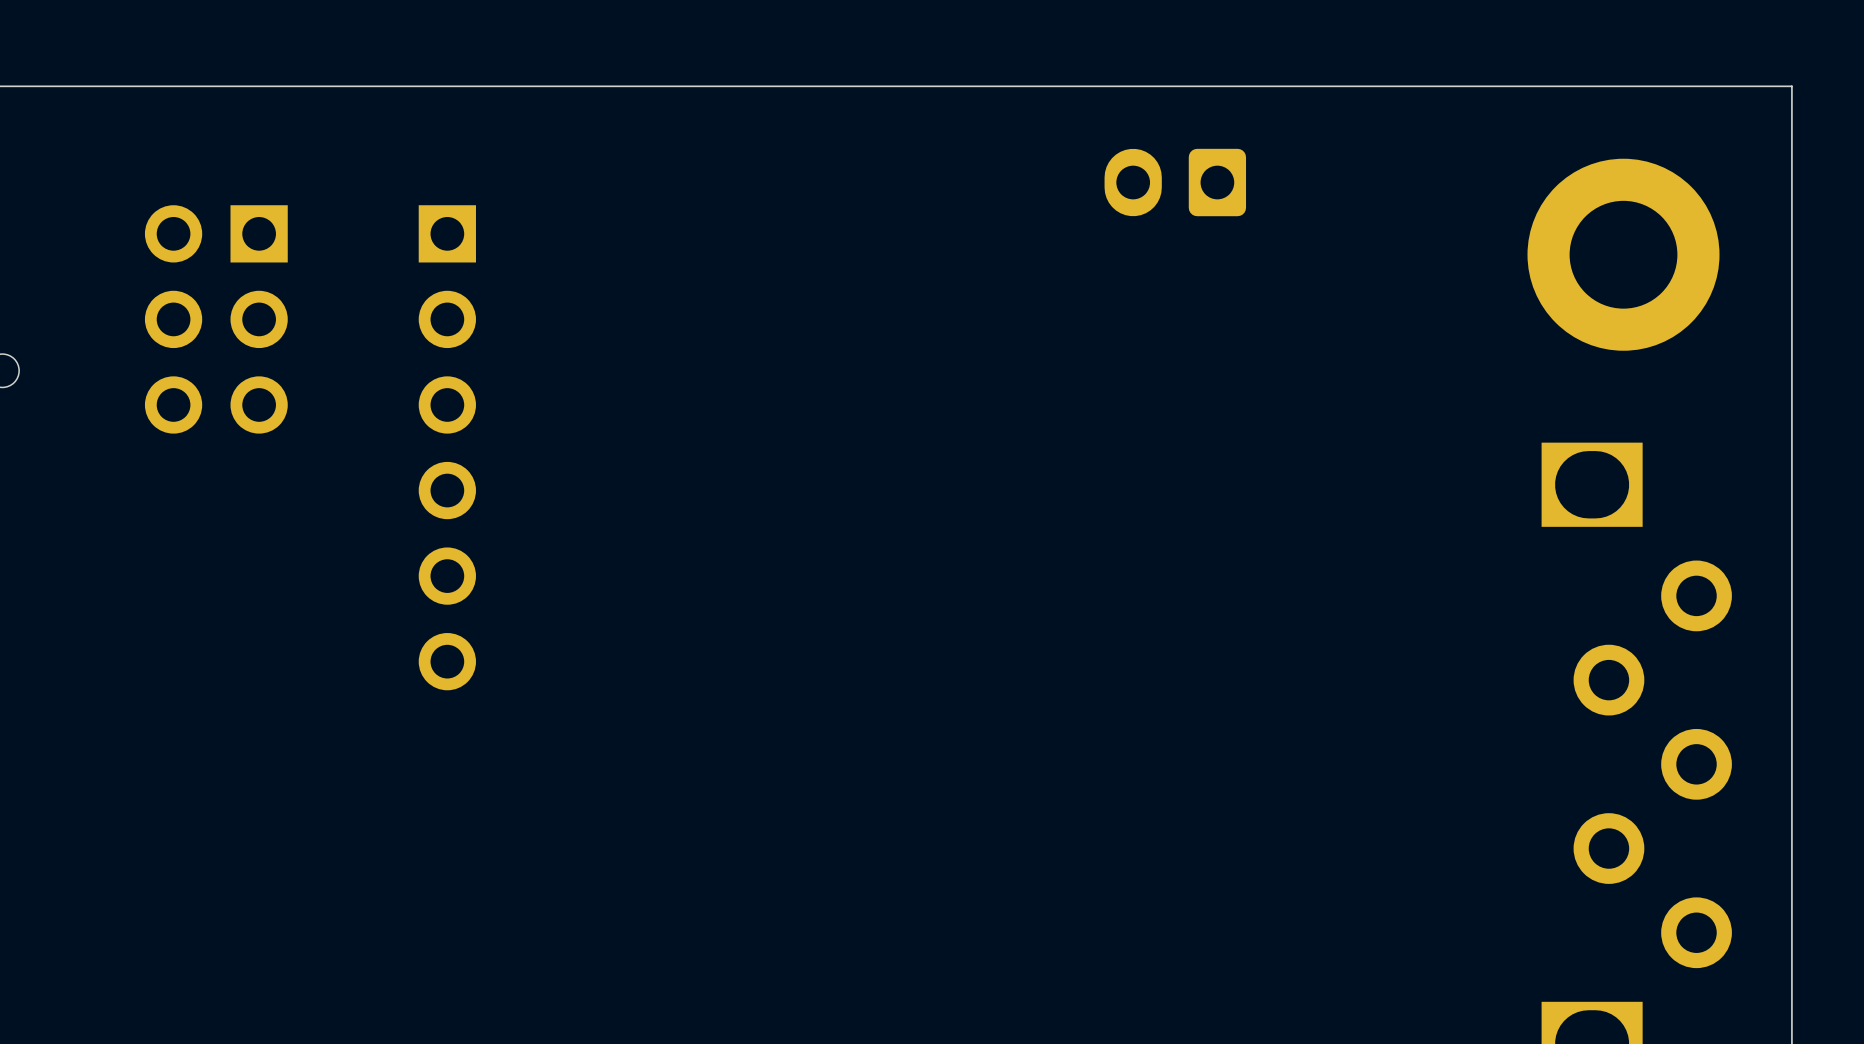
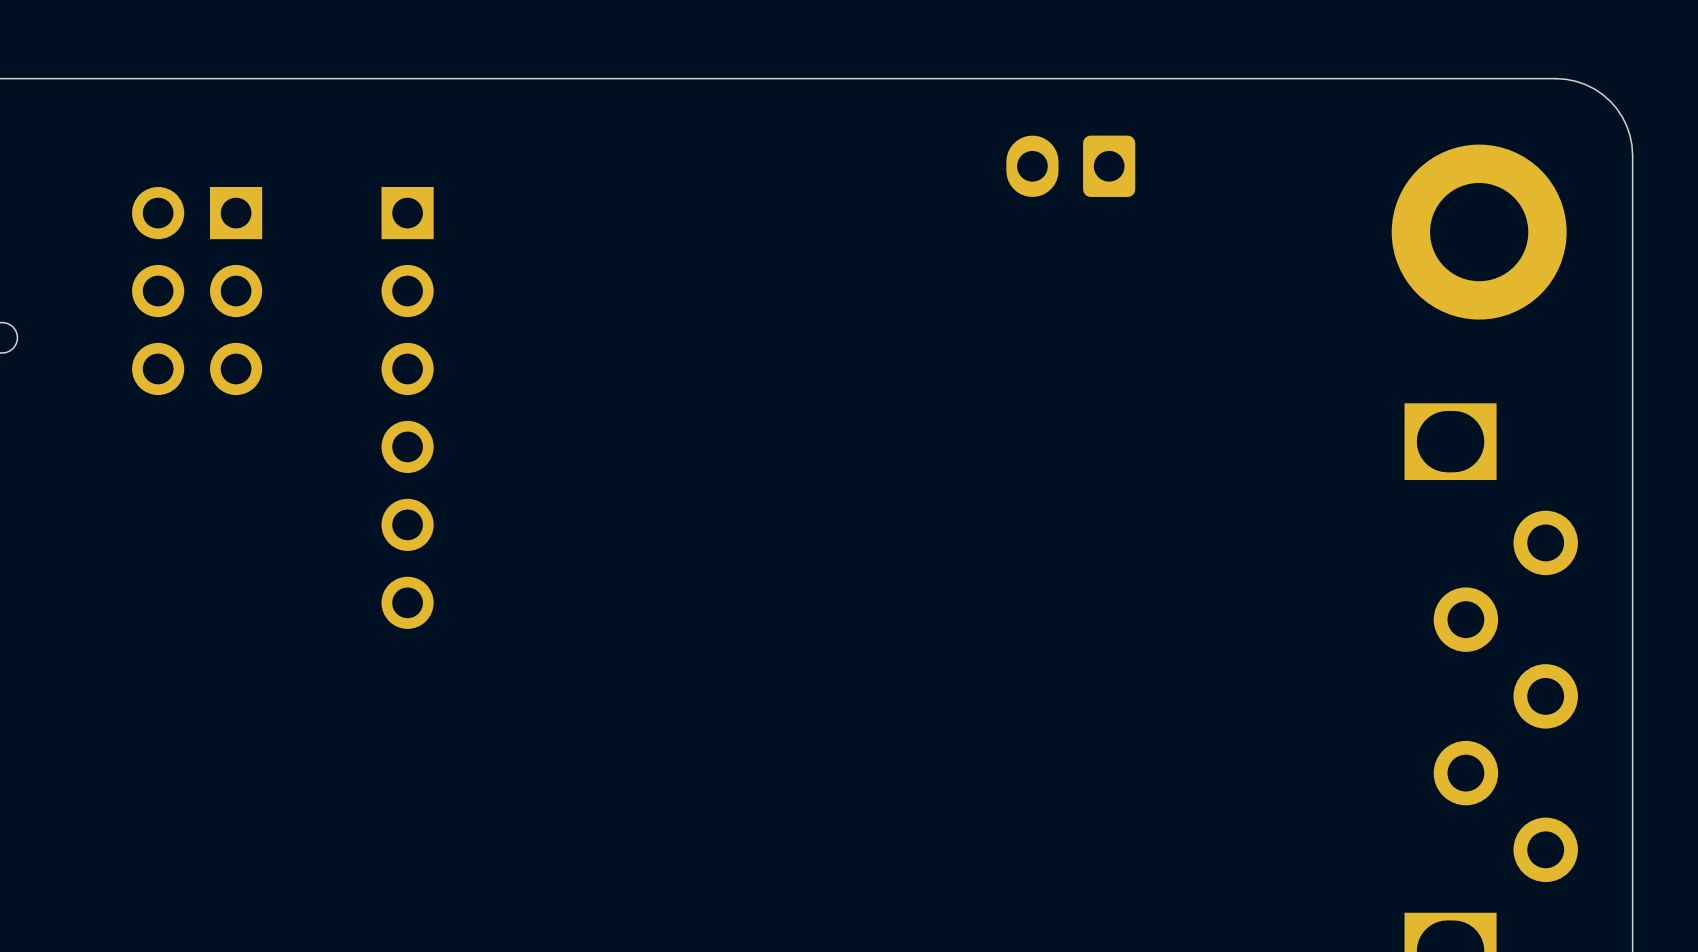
board edge: (1707, 86) (1791, 86) (1791, 170) -> (1555, 78) (1585, 84) (1610, 101) (1626, 126) (1632, 155)

